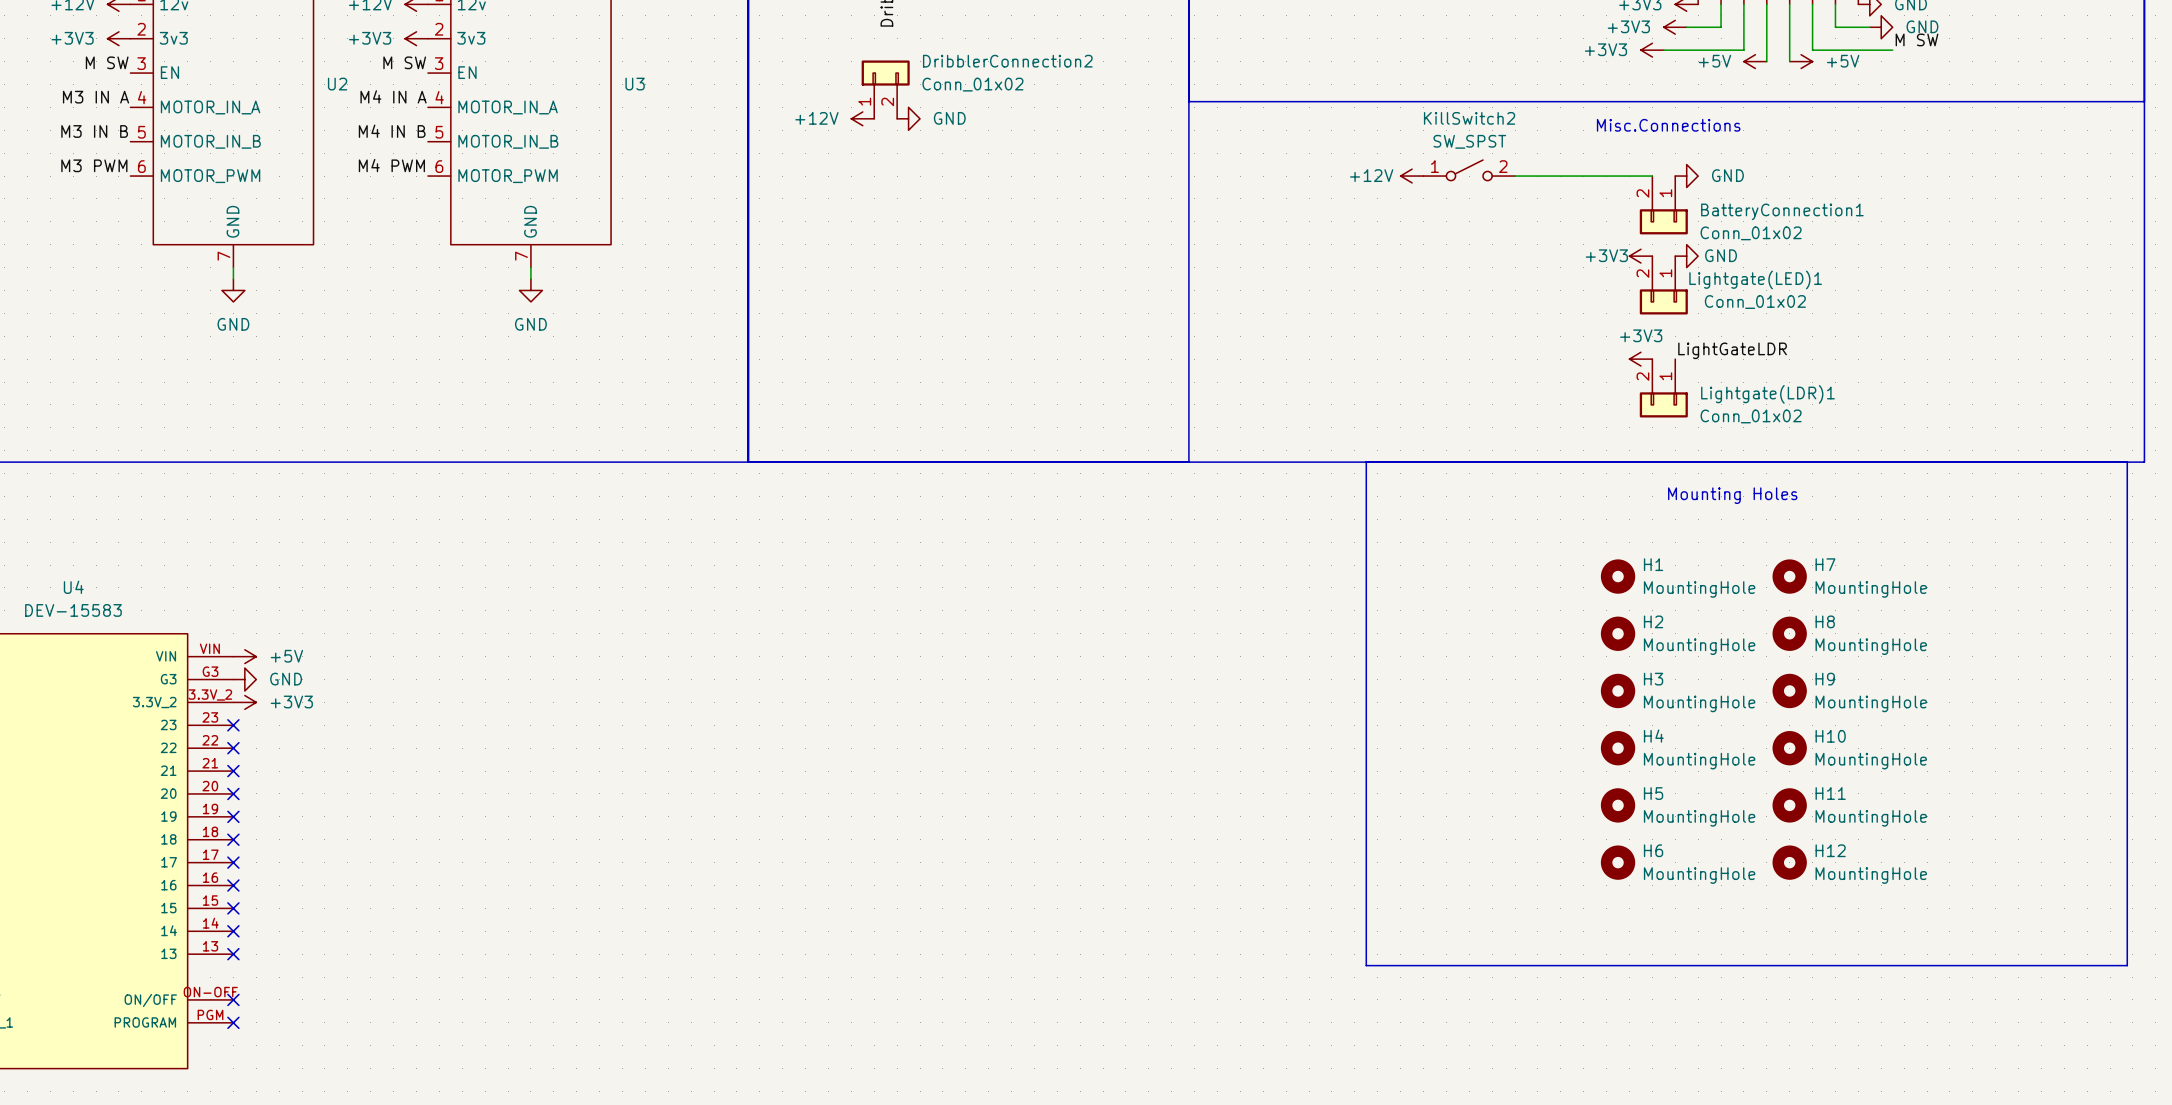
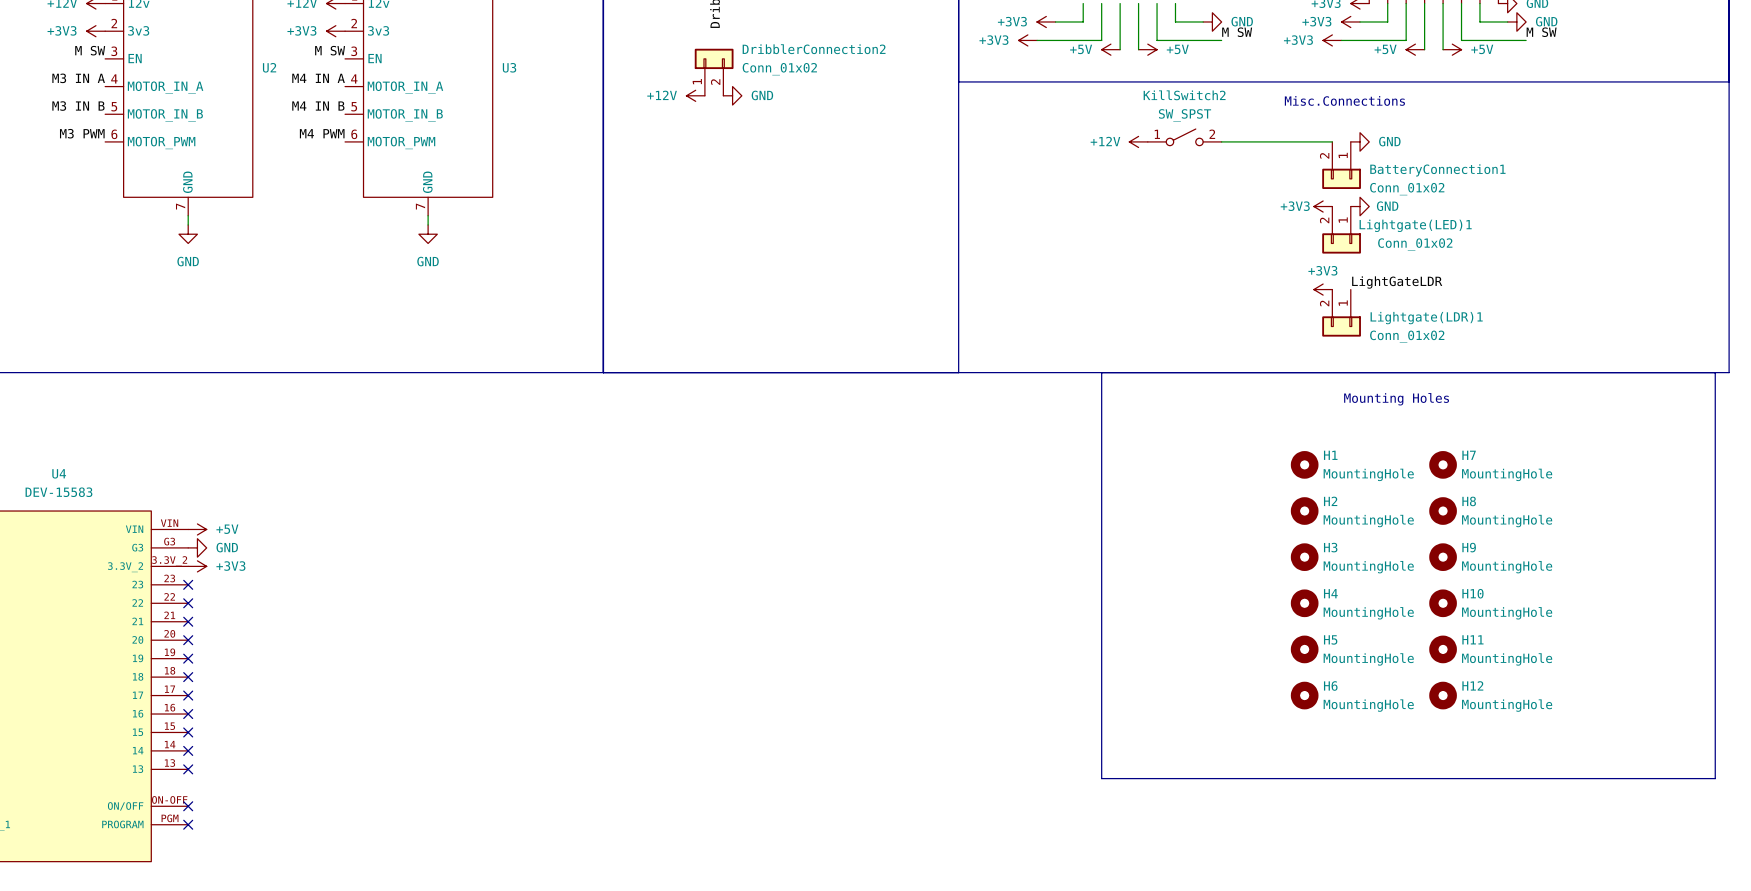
wire: none -> (1083, 3) (1083, 21) (1055, 21)
wire: none -> (1101, 3) (1101, 40) (1037, 40)
wire: none -> (1120, 3) (1120, 49)
wire: none -> (1138, 3) (1138, 49)
wire: none -> (1157, 3) (1157, 40) (1221, 40)
wire: none -> (1175, 3) (1175, 21) (1203, 21)
power symbol: none -> +3V3 (1046, 21)
power symbol: none -> GND (1212, 21)
label: none -> M SW (1237, 32)
power symbol: none -> +3V3 (1027, 40)
power symbol: none -> +5V (1110, 49)
power symbol: none -> +5V (1147, 49)

